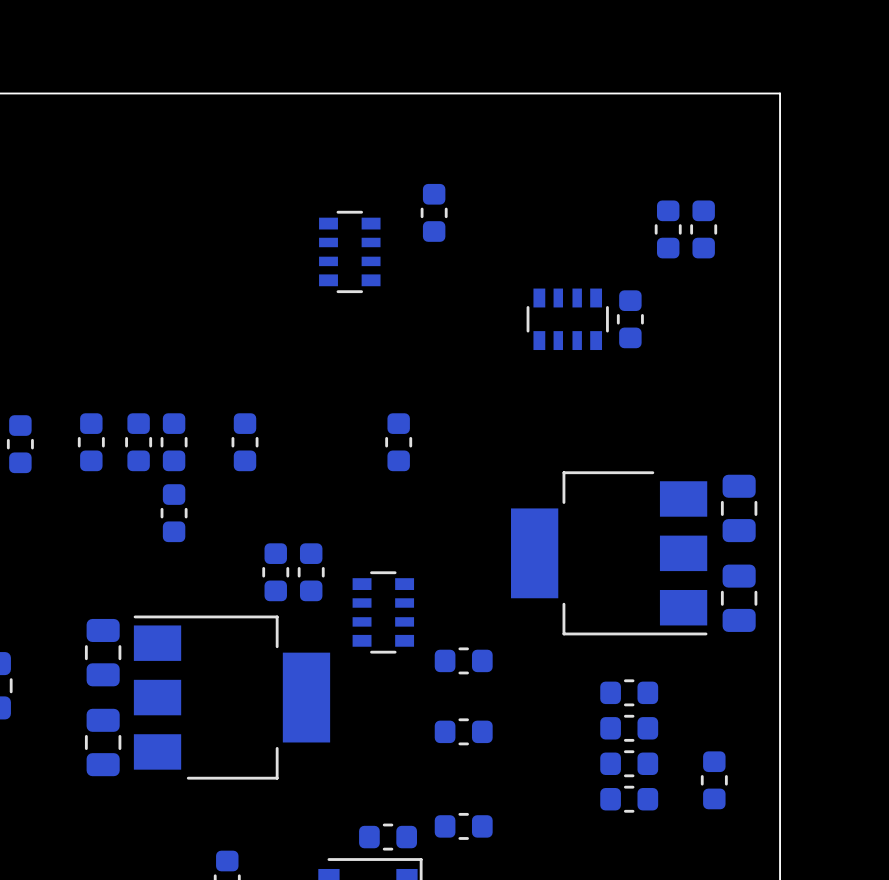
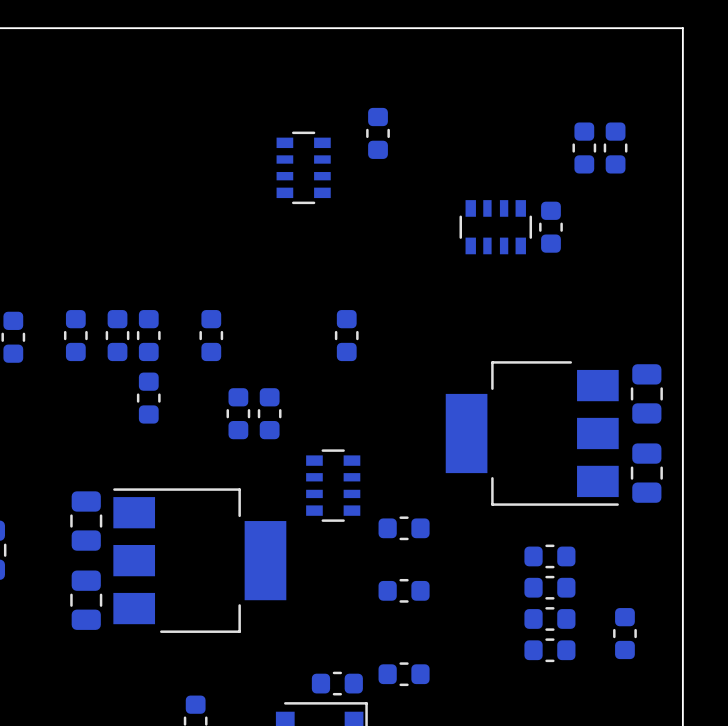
part: none -> (238, 413)
part: none -> (269, 413)
part: (275, 572) -> none
part: (311, 572) -> none

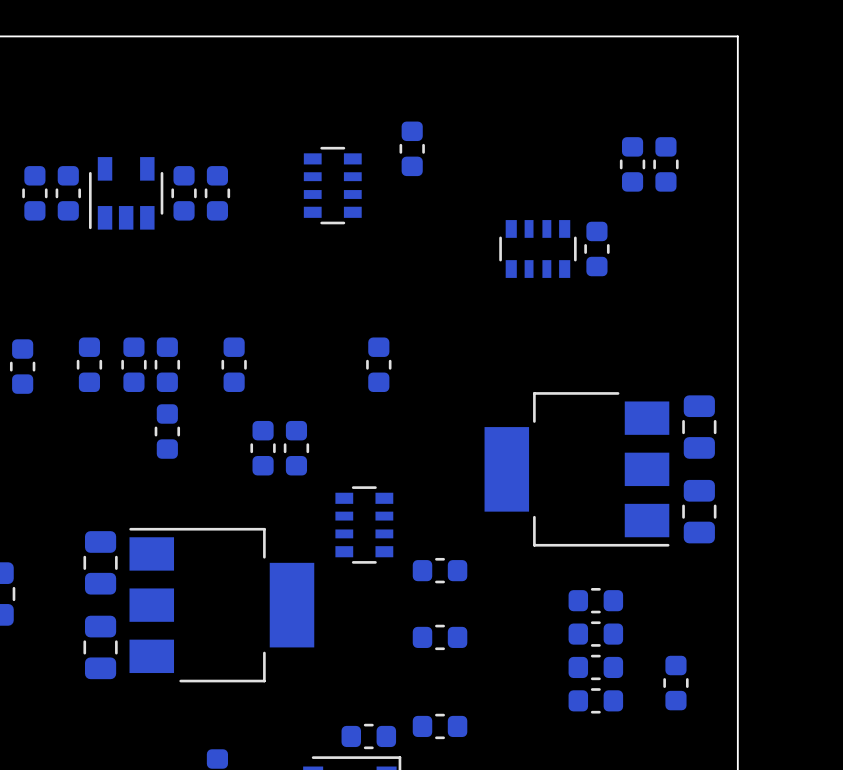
part: none -> (34, 193)
part: none -> (68, 193)
part: none -> (126, 193)
part: none -> (184, 193)
part: none -> (217, 193)

